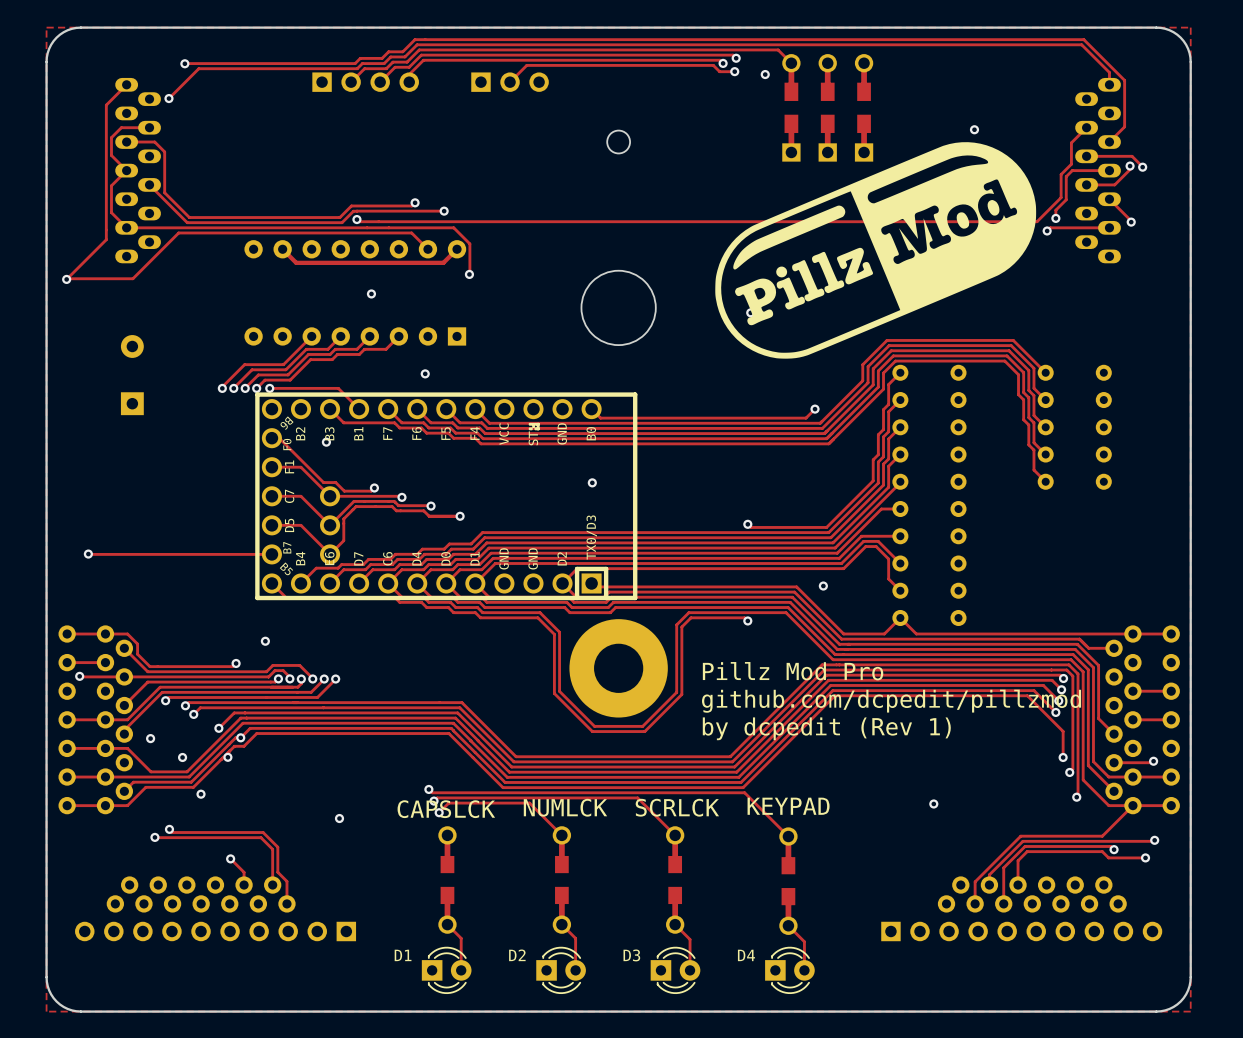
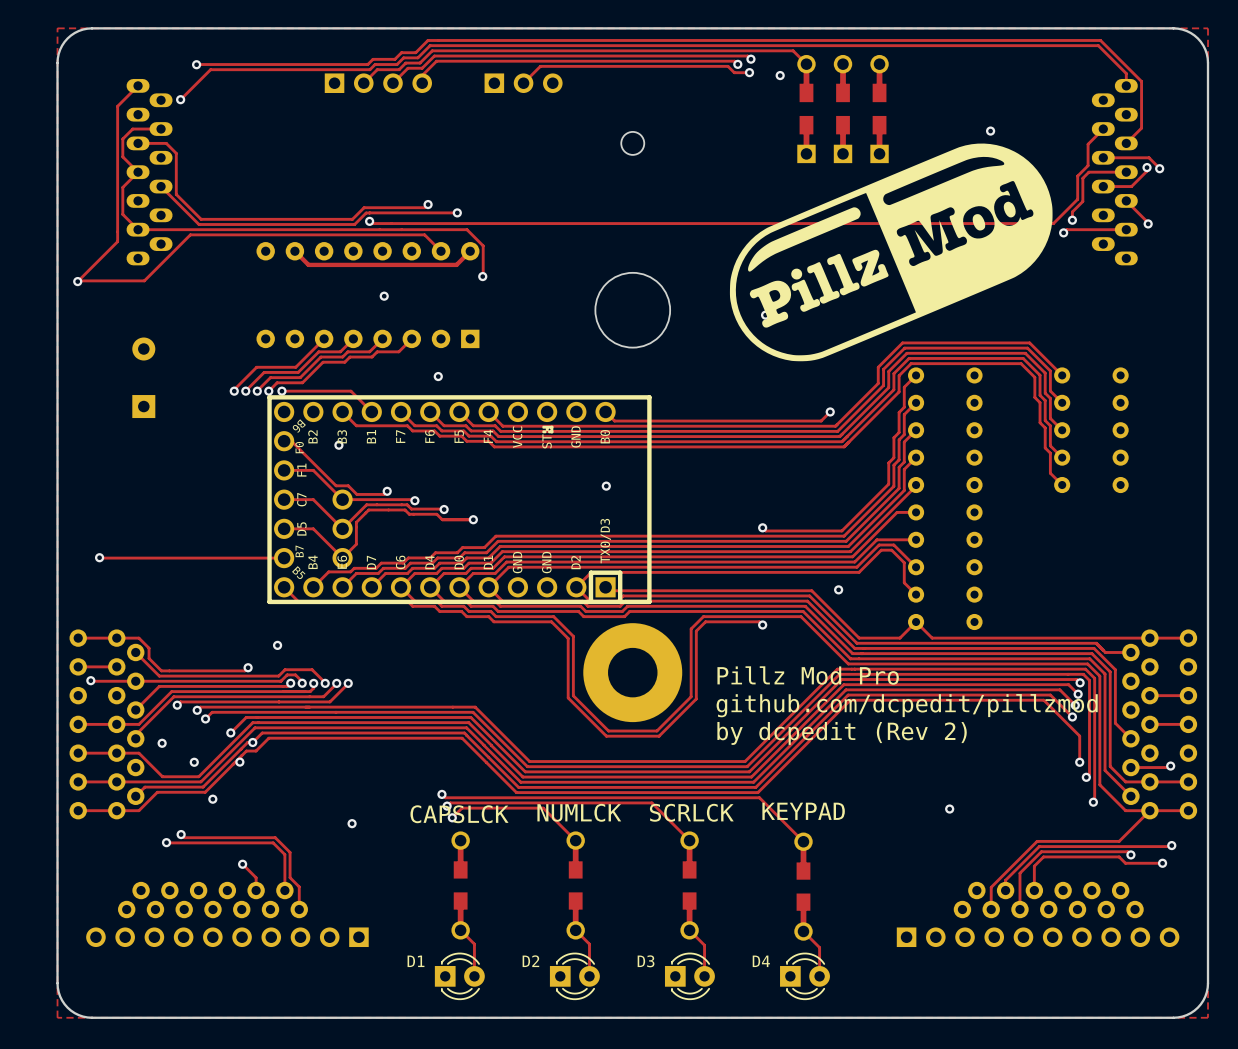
text: by dcpedit (Rev 1) (826, 728) -> by dcpedit (Rev 2) (842, 733)

